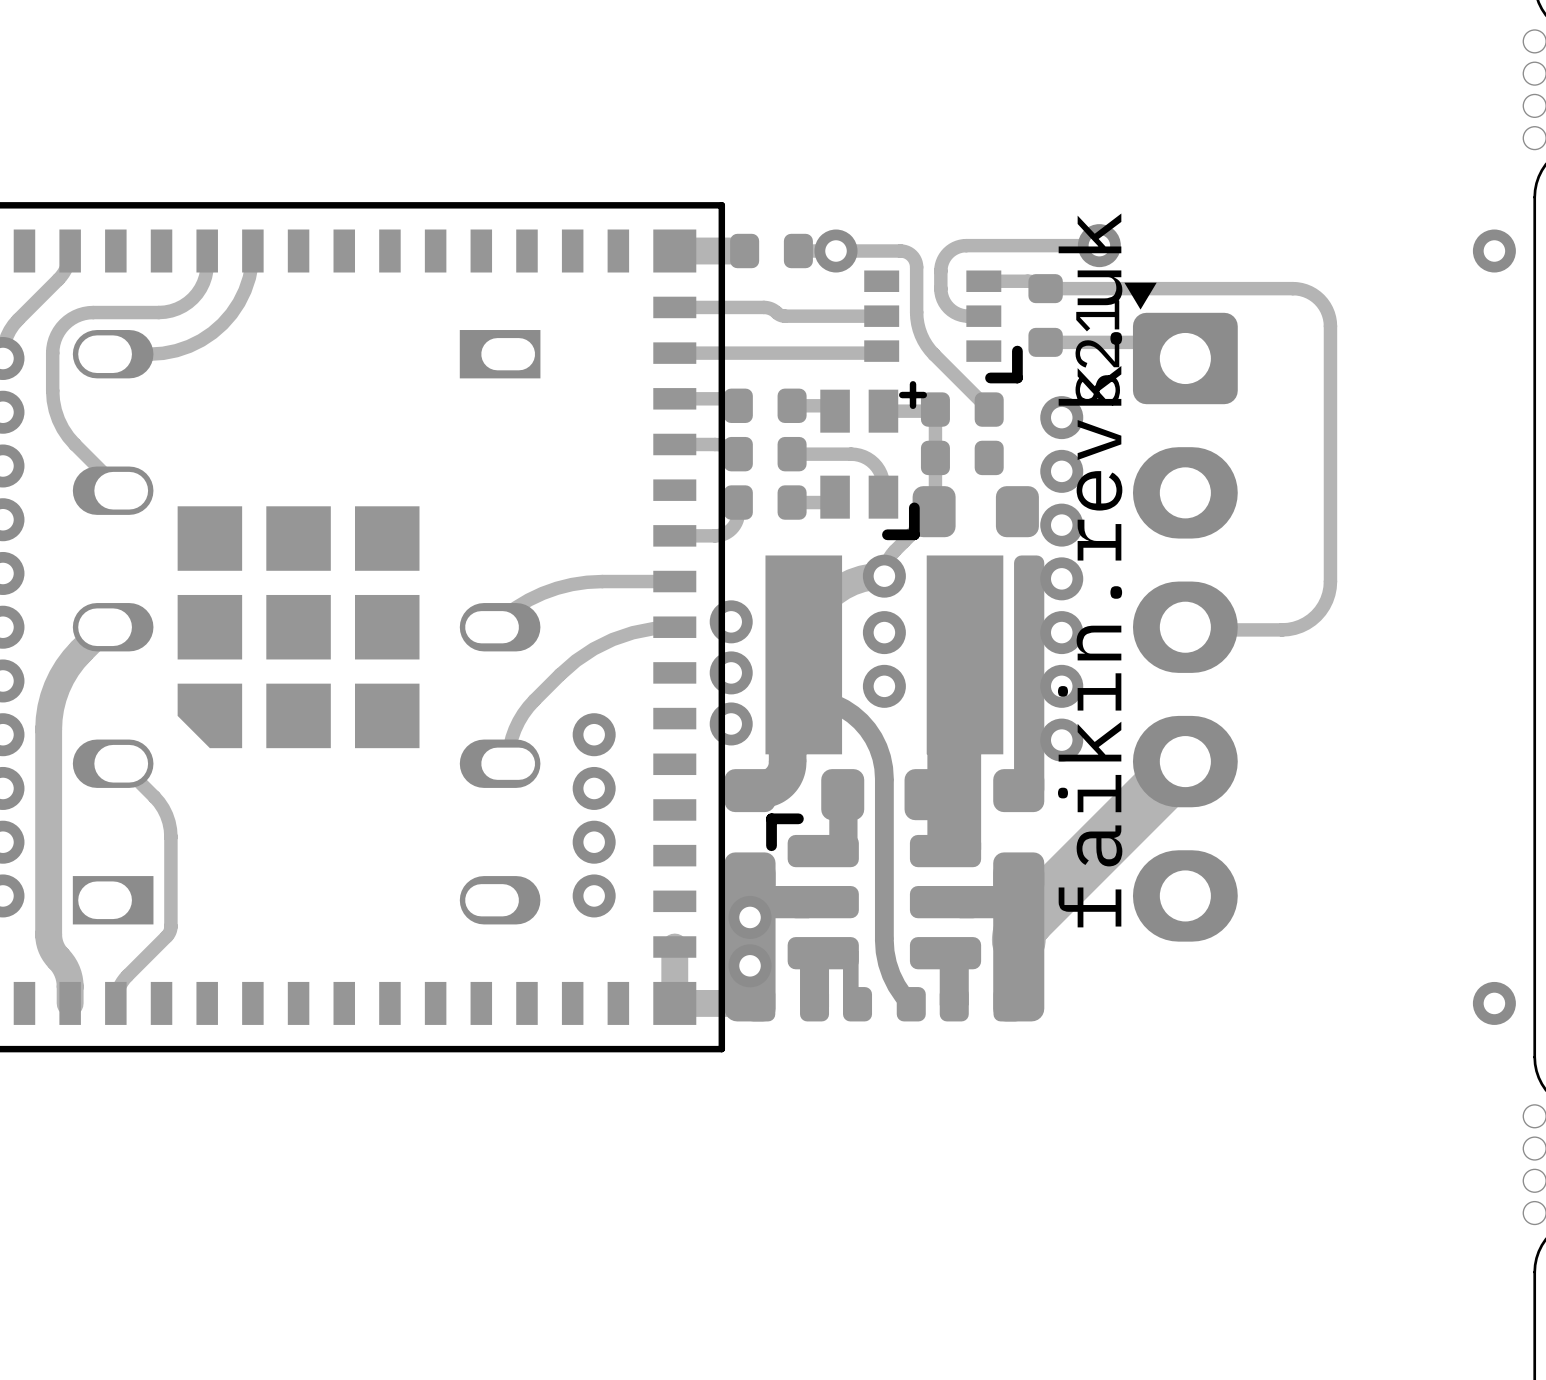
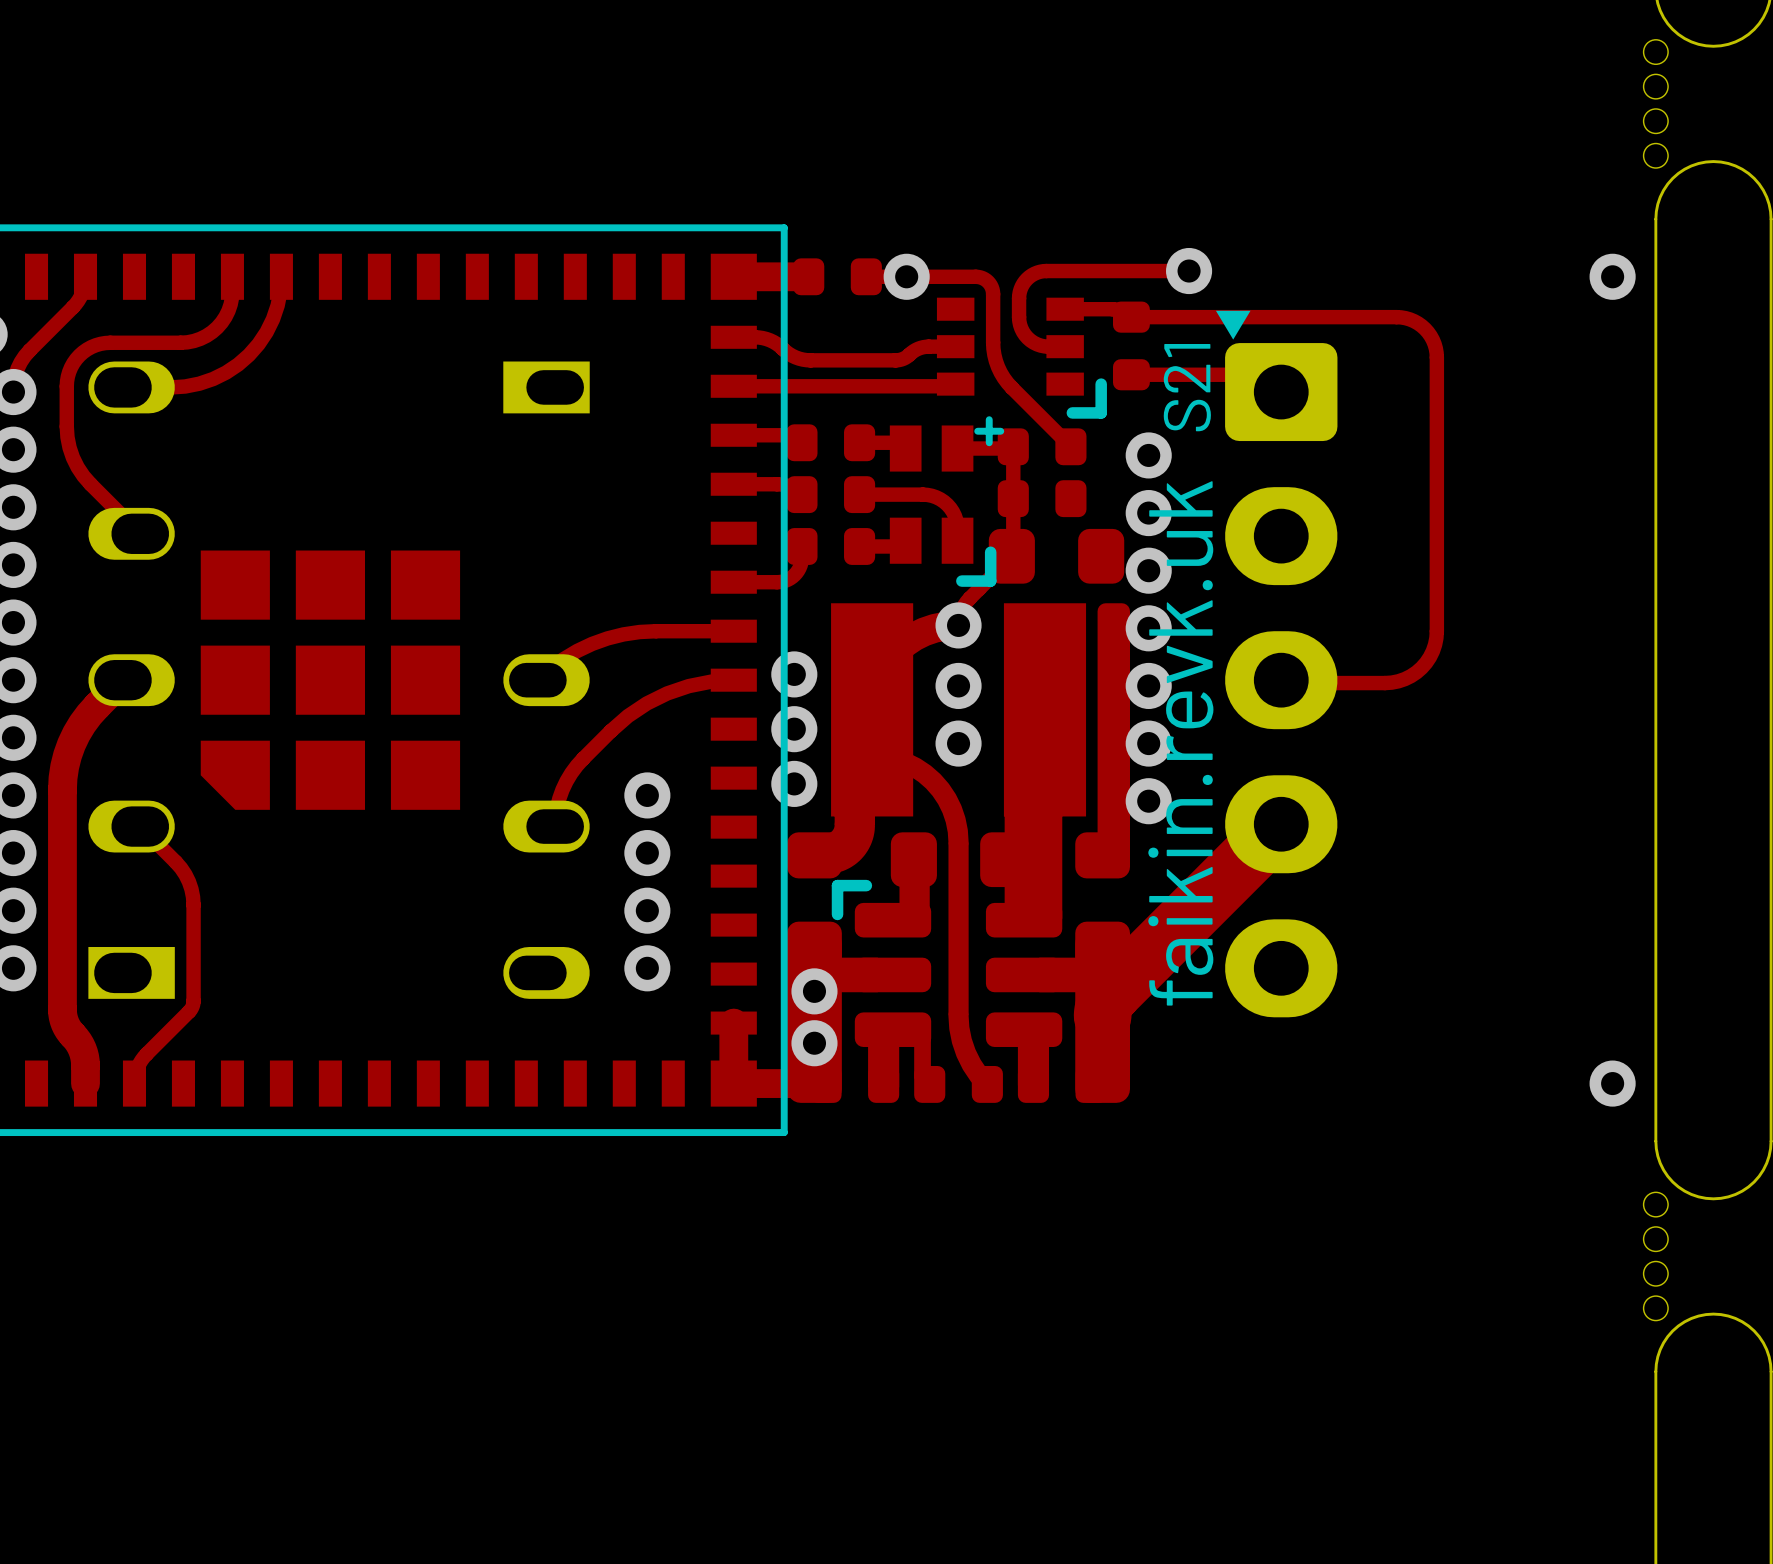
track: (694, 307) (765, 307) (783, 316) (856, 316) -> (754, 337) (770, 340) (792, 355) (806, 360) (897, 360) (904, 358) (918, 348) (928, 346)

